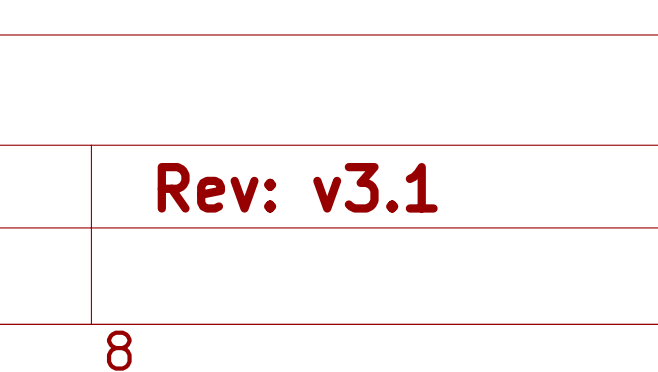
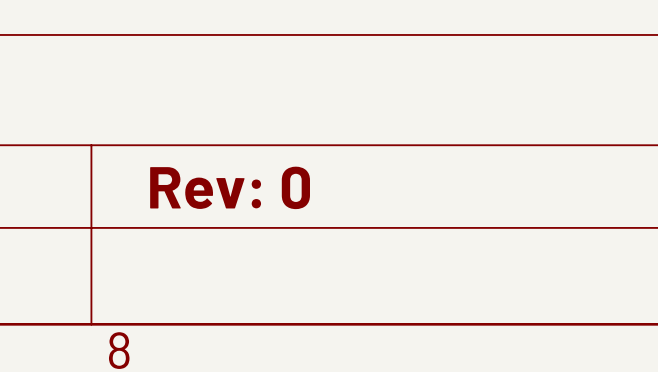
title block: Rev: v3.1 (297, 187) -> Rev: 0 (230, 187)

